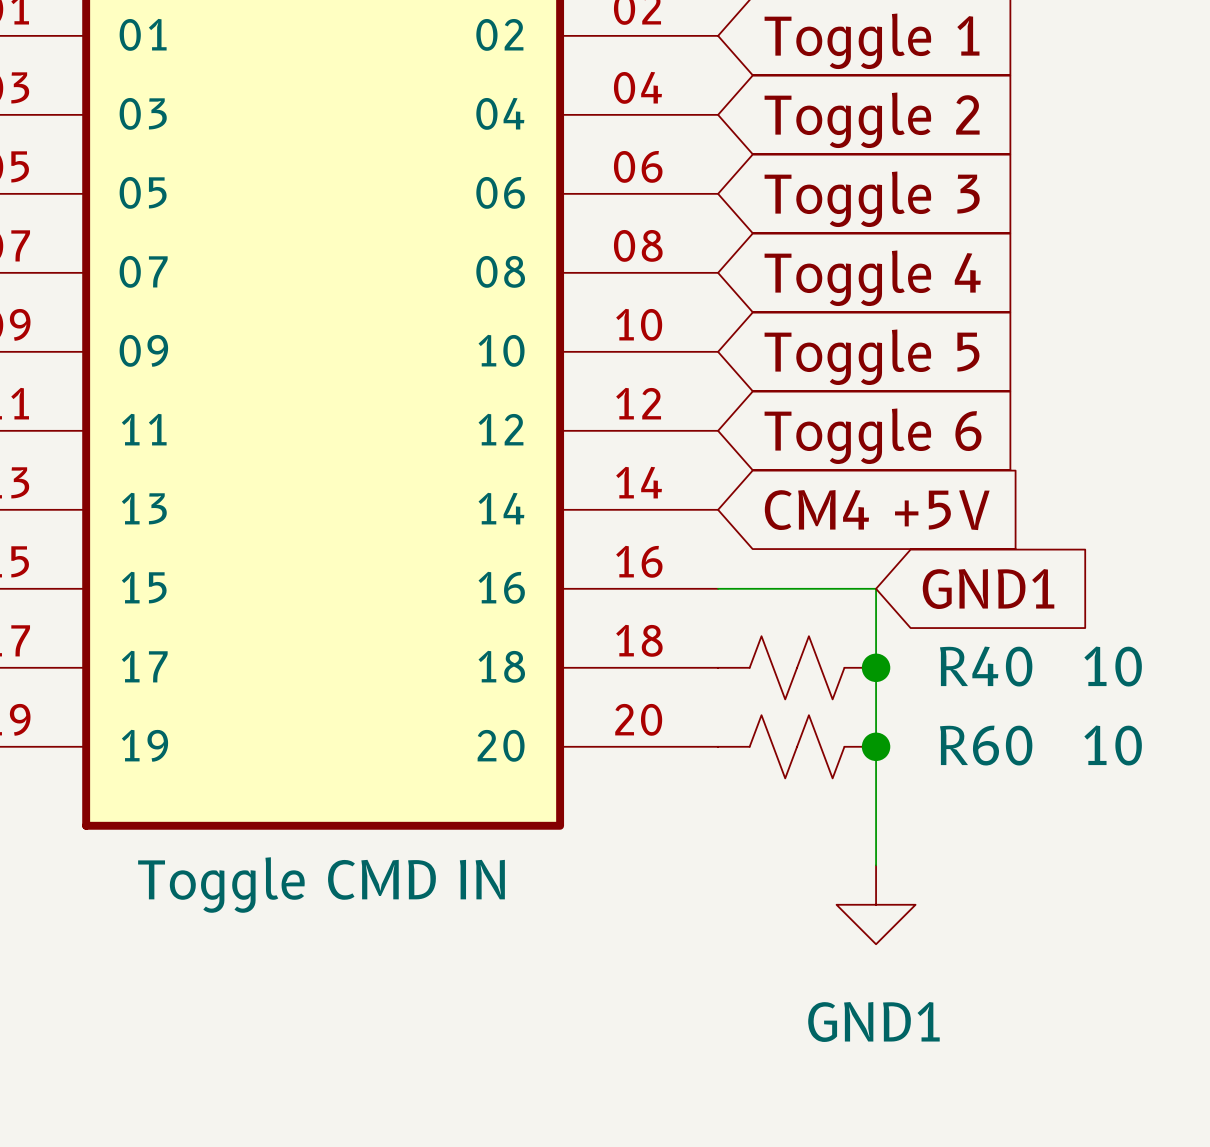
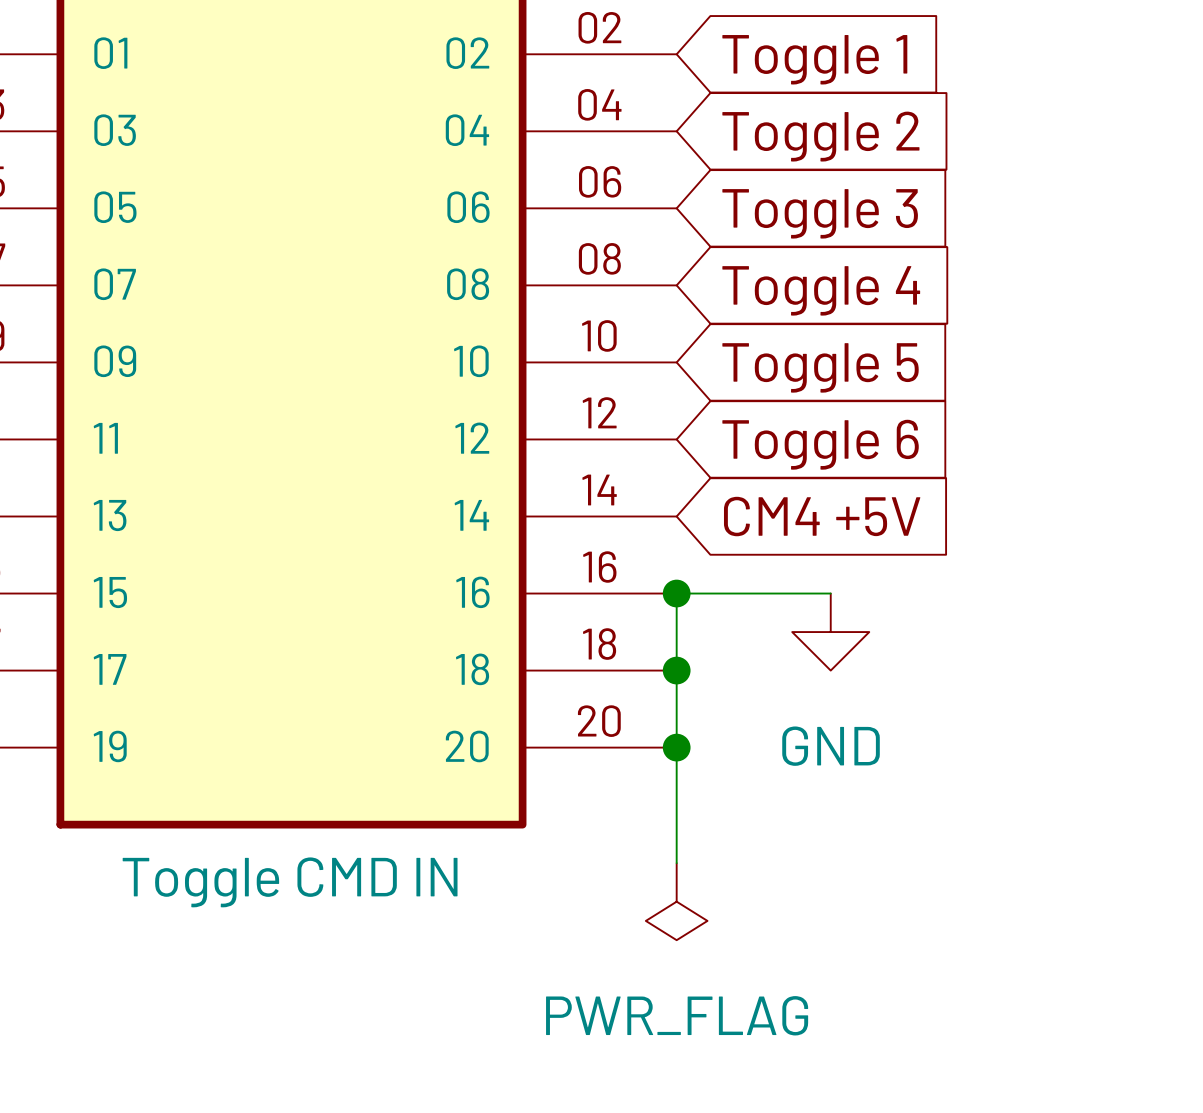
junction: none -> (676, 593)
wire: (876, 588) (876, 865) -> (676, 593) (676, 863)
global label: GND1 (988, 589) -> none
power symbol: none -> GND (830, 632)
junction: none -> (676, 670)
R40: 10 (797, 667) -> none
junction: (876, 667) -> none
junction: none -> (676, 747)
R60: 10 (797, 746) -> none
junction: (876, 746) -> none
power symbol: none -> PWR_FLAG (676, 901)
power symbol: GND1 (876, 904) -> none

